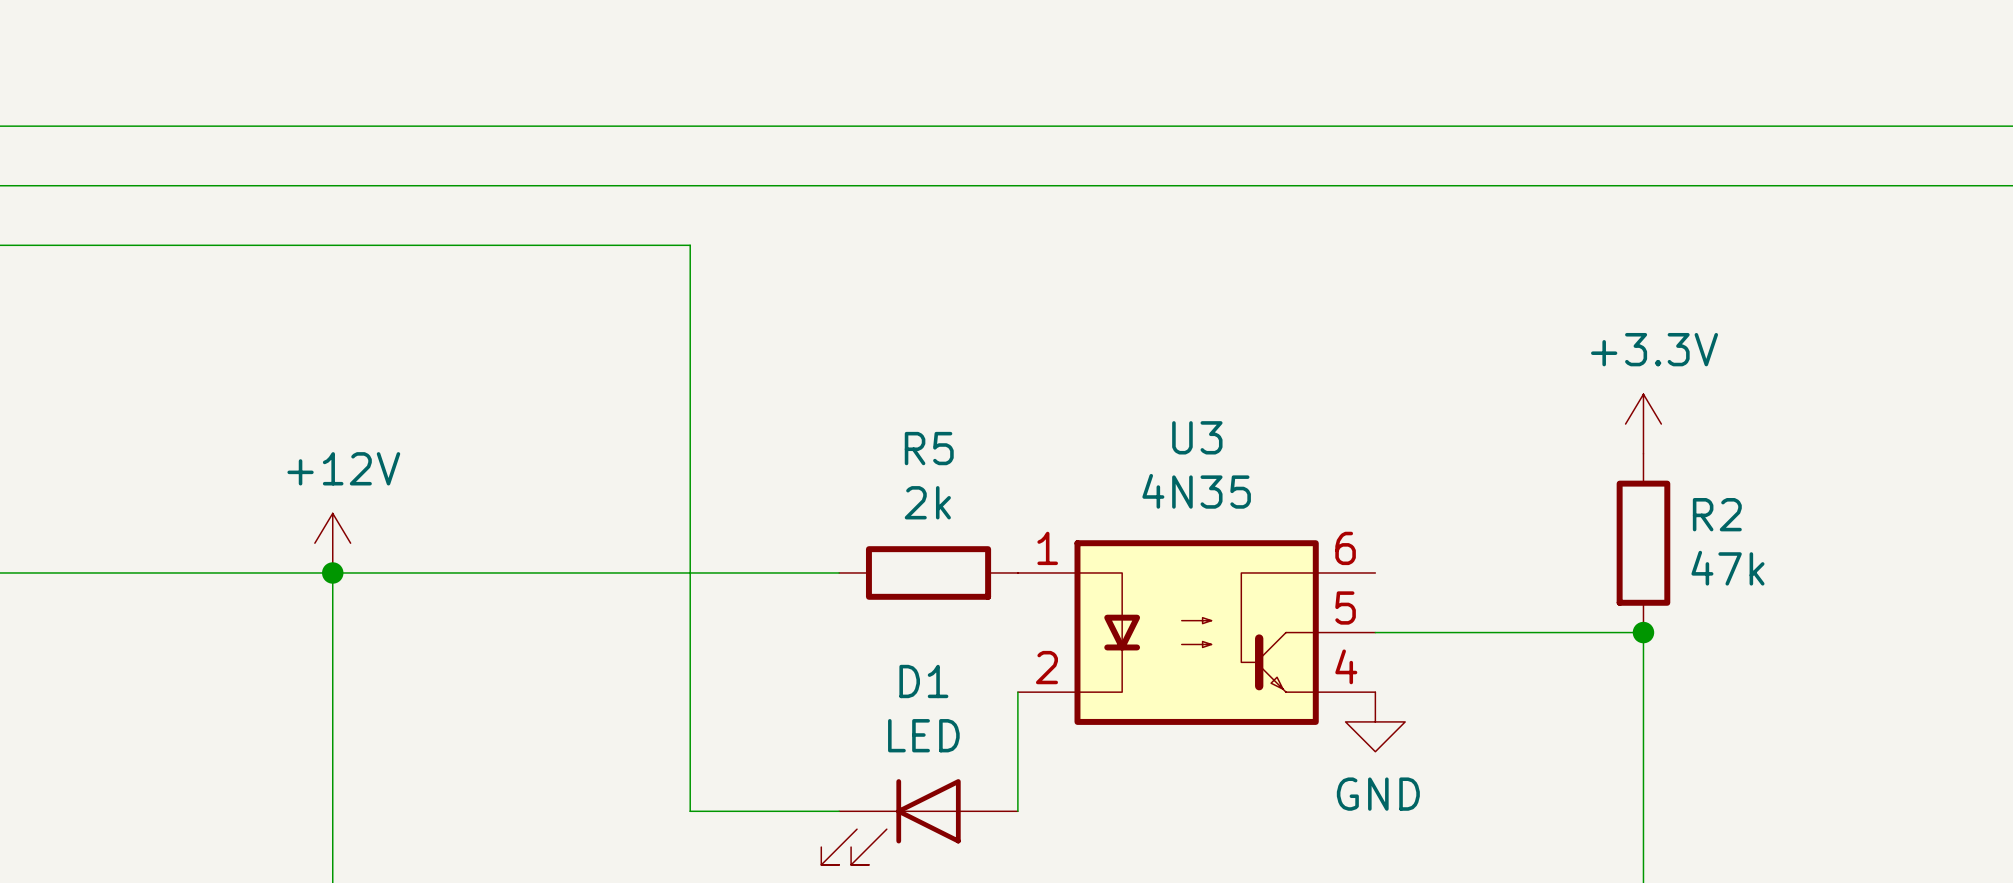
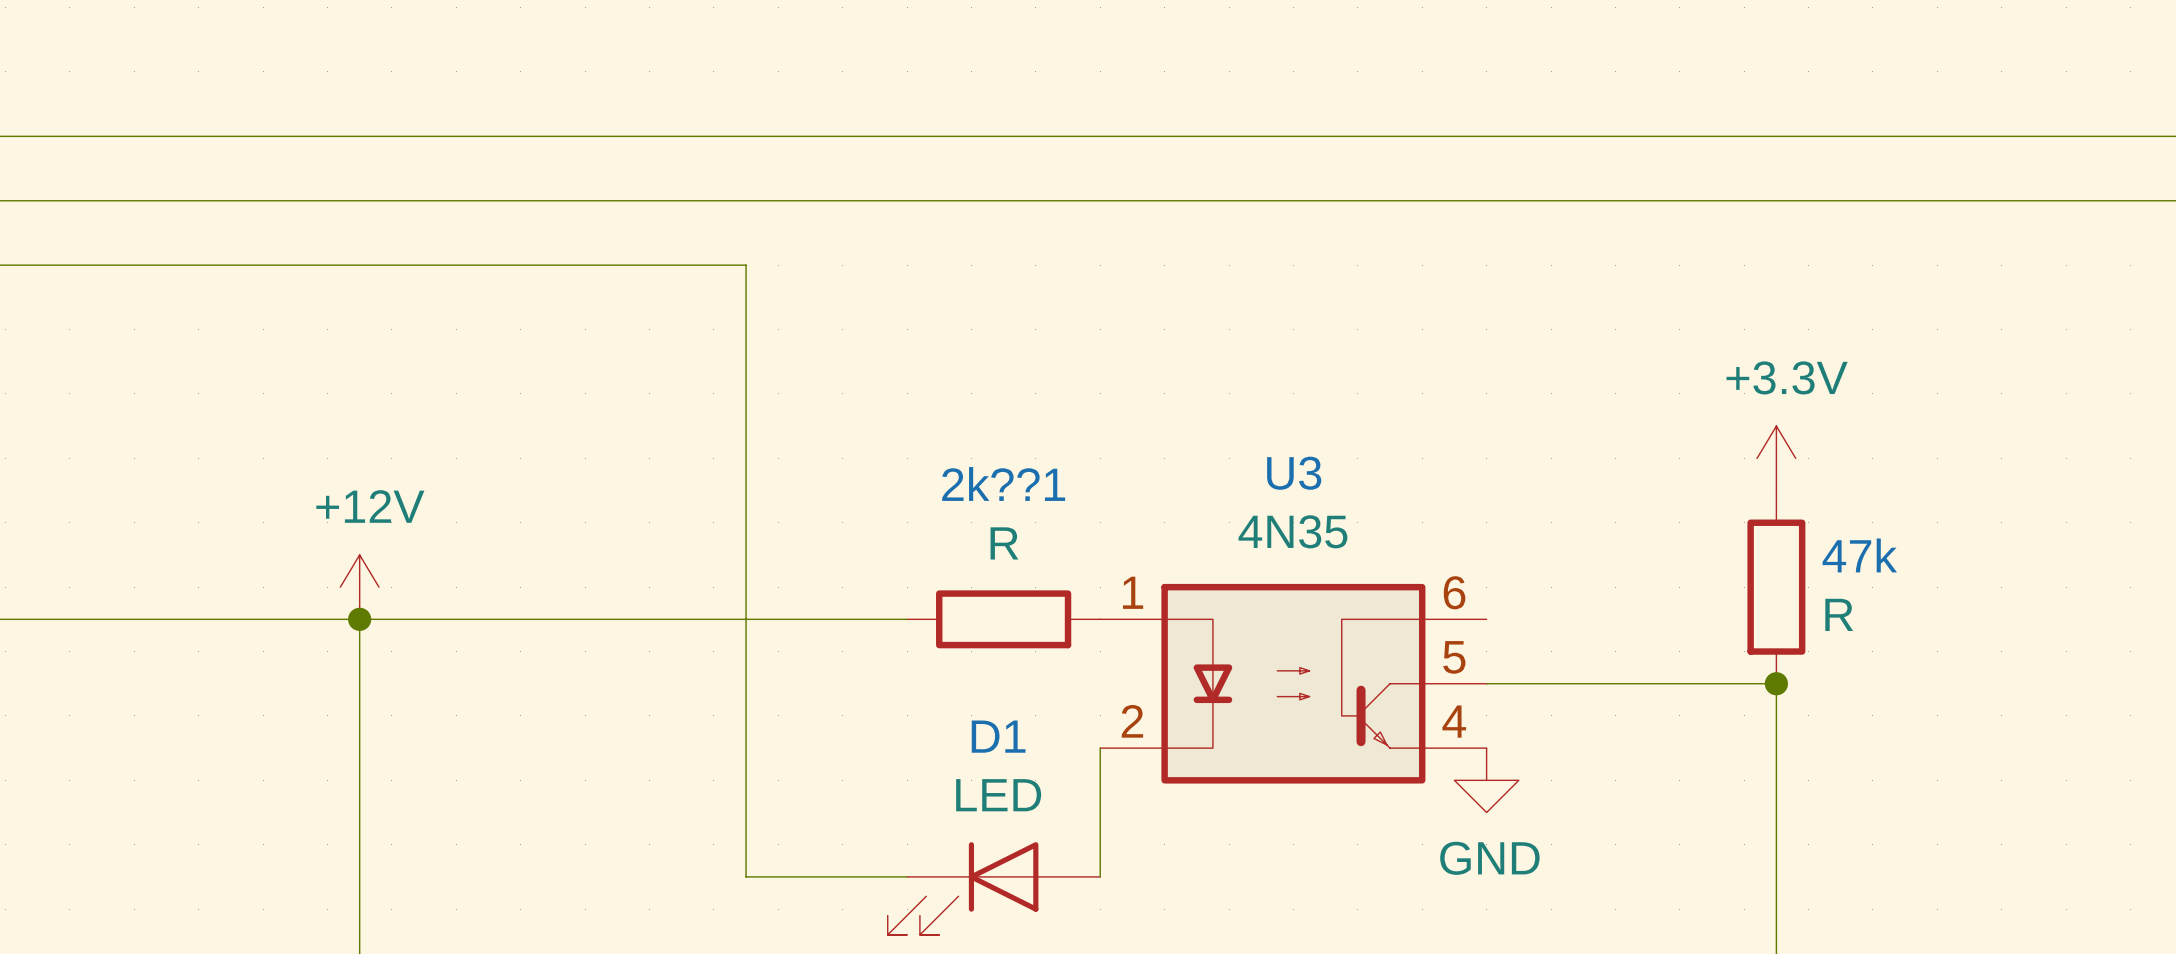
R5 name: R5 (929, 448) -> 2k??1 (1003, 483)
R5 value: 2k (927, 502) -> R (1004, 543)
R2 name: R2 (1717, 514) -> 47k (1859, 555)
R2 value: 47k (1727, 568) -> R (1839, 614)

